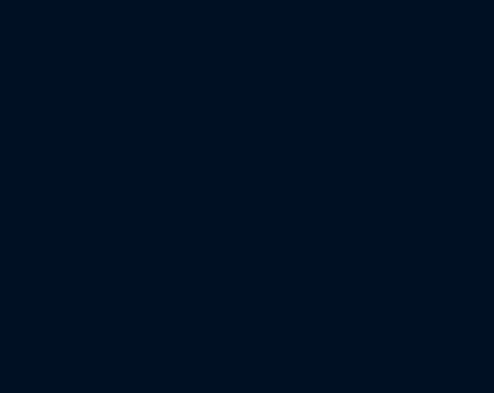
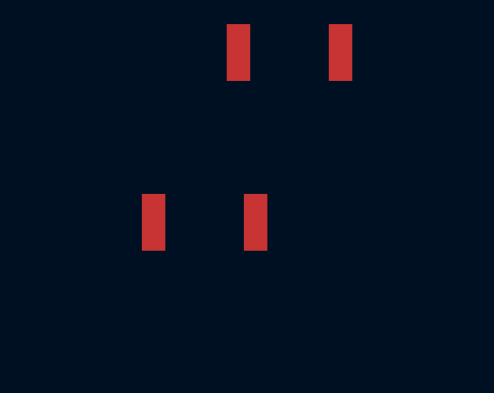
part: none -> (289, 52)
part: none -> (204, 222)

